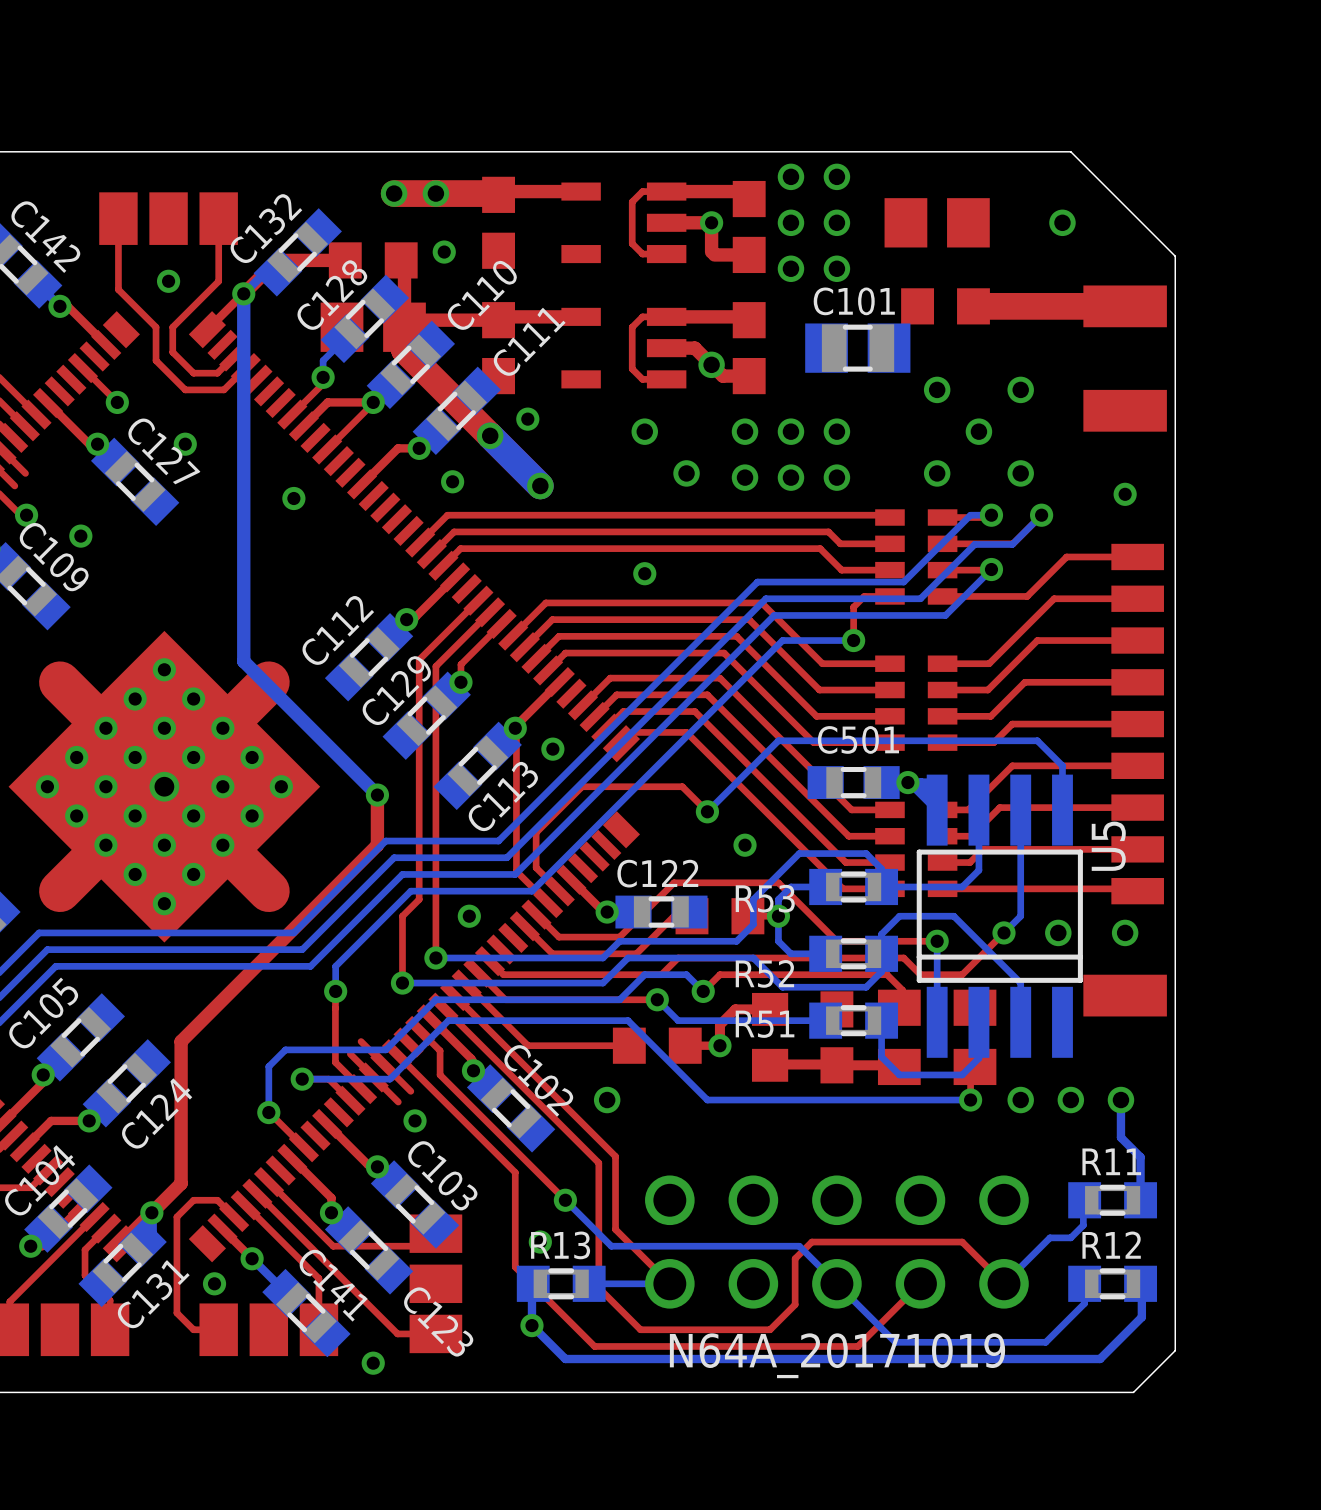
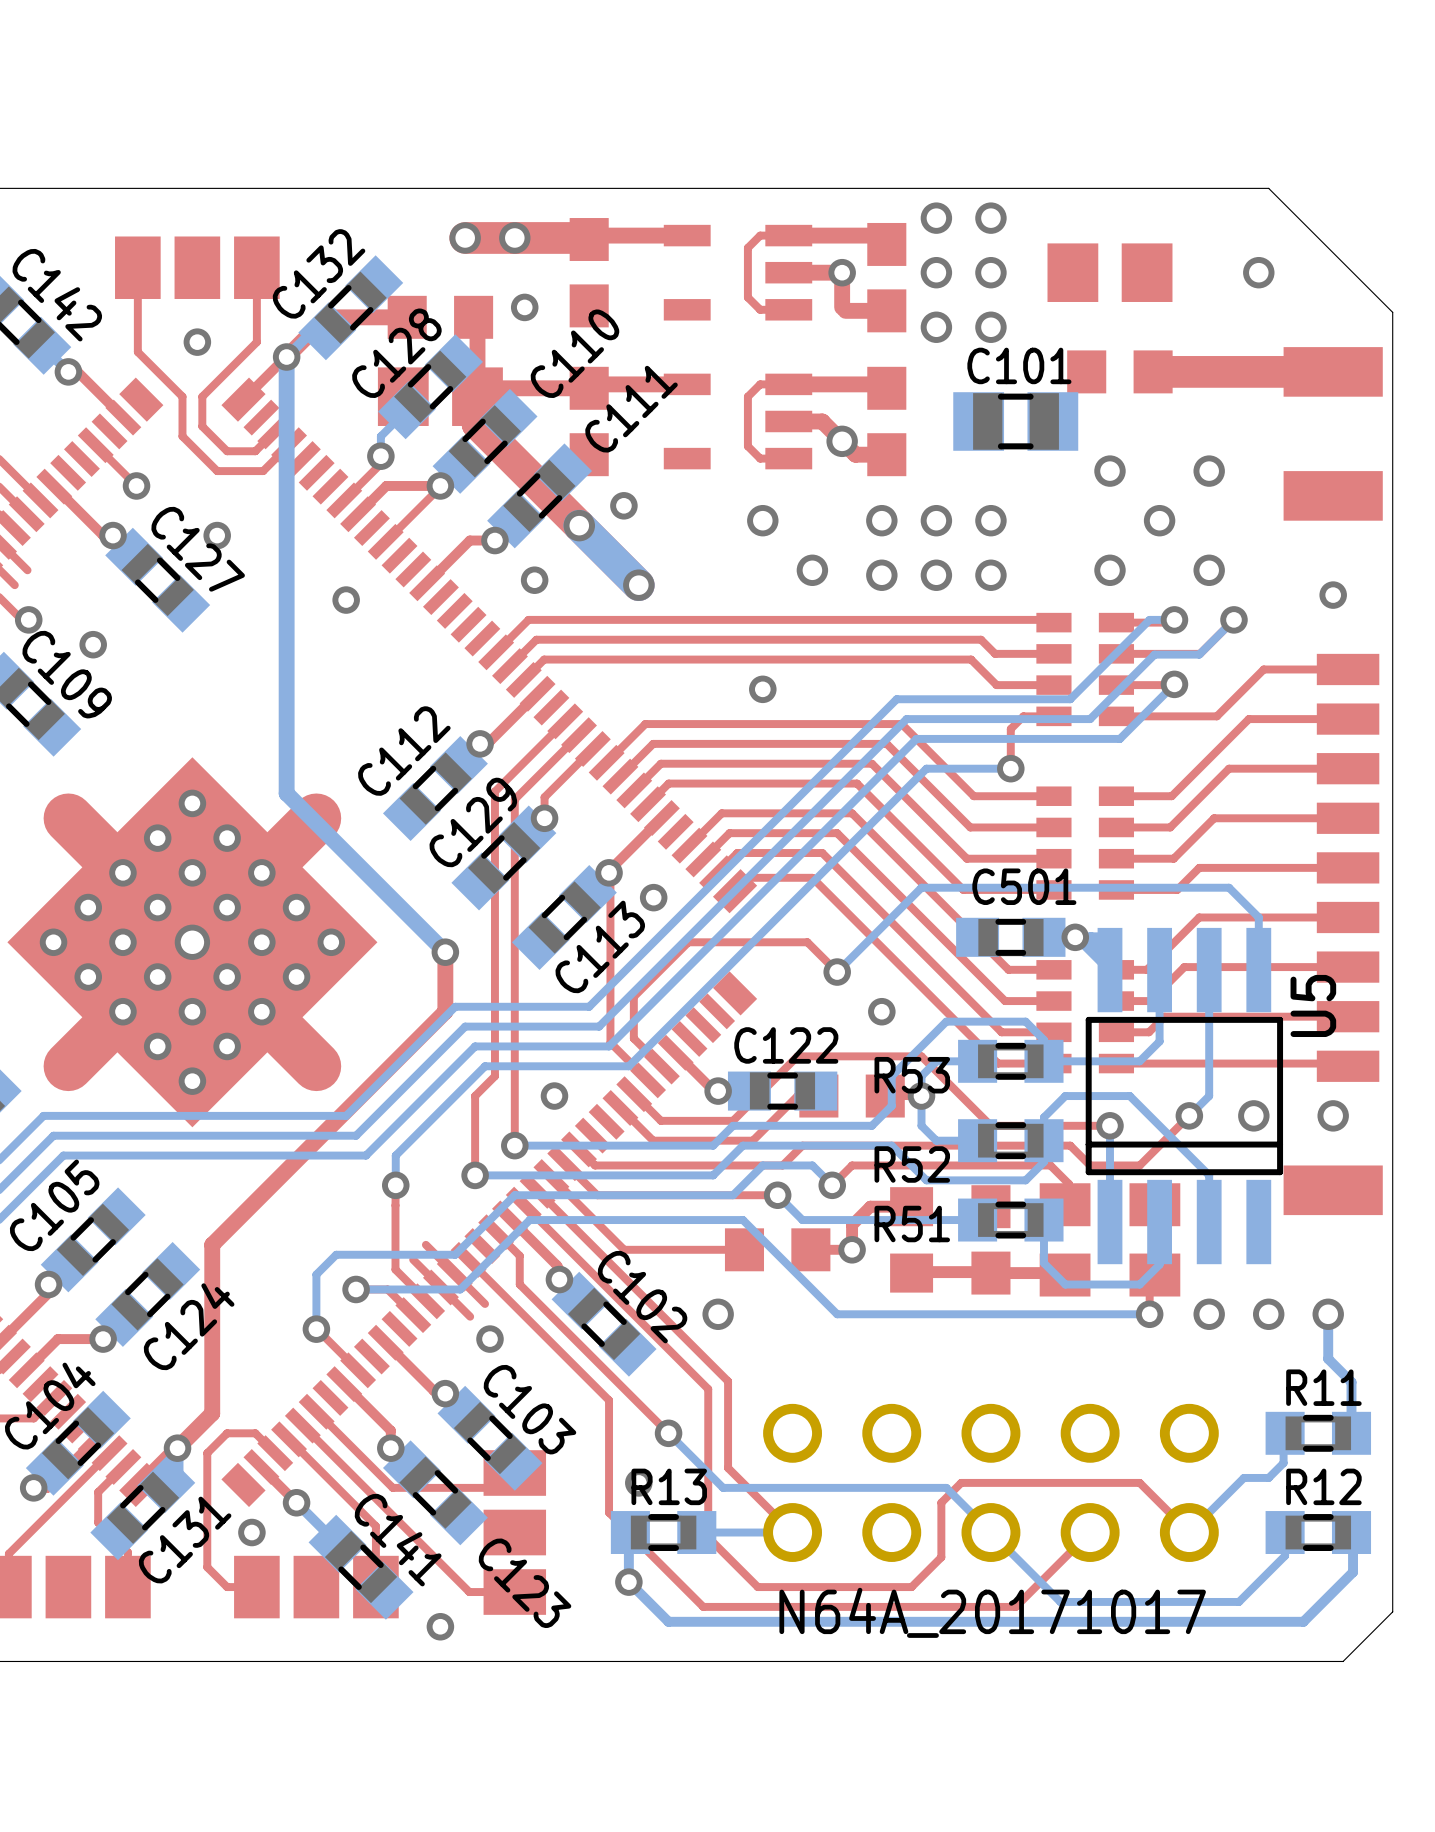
text: N64A_20171019 (837, 1355) -> N64A_20171017 (992, 1612)

